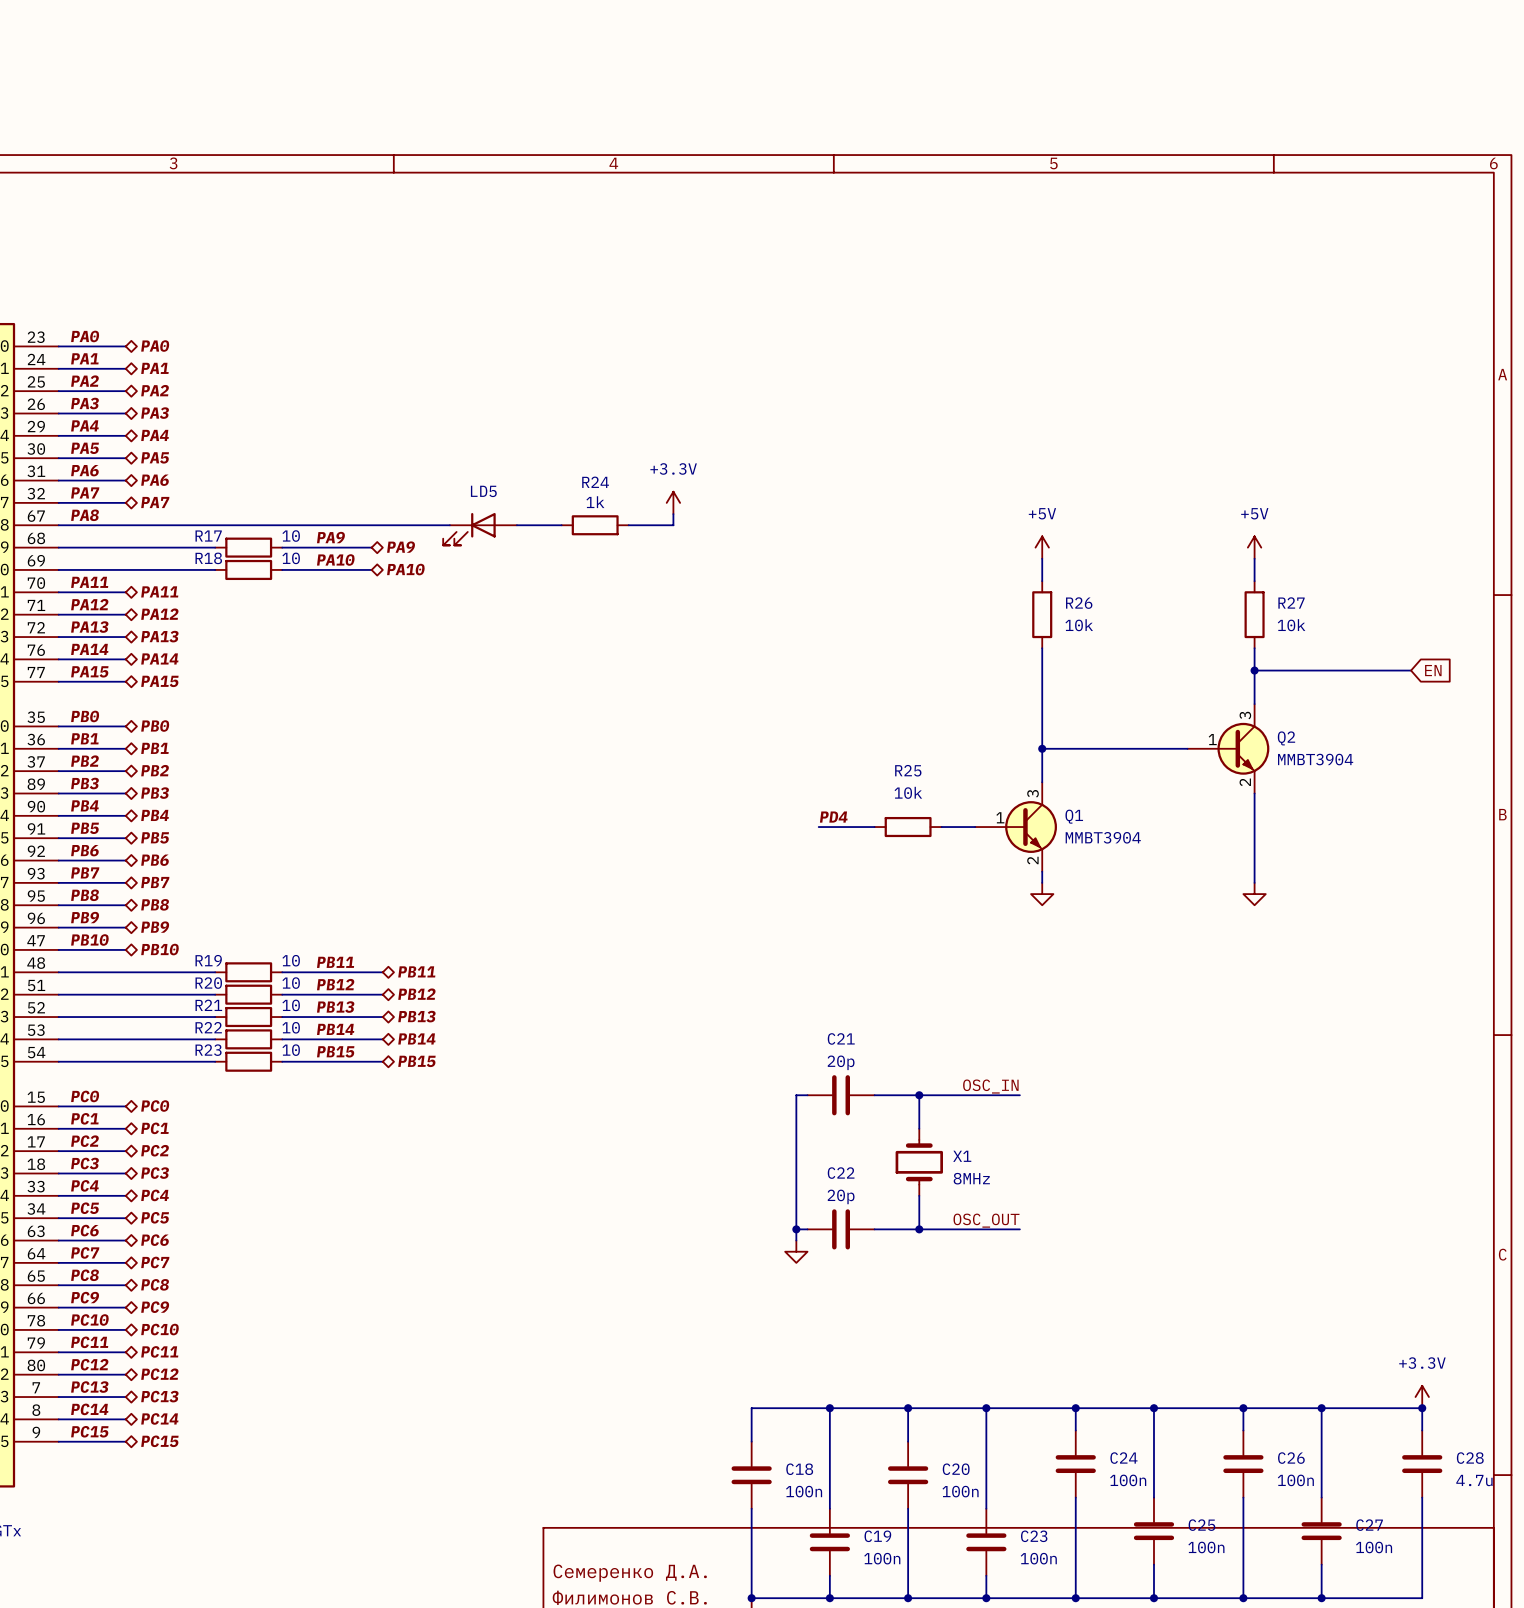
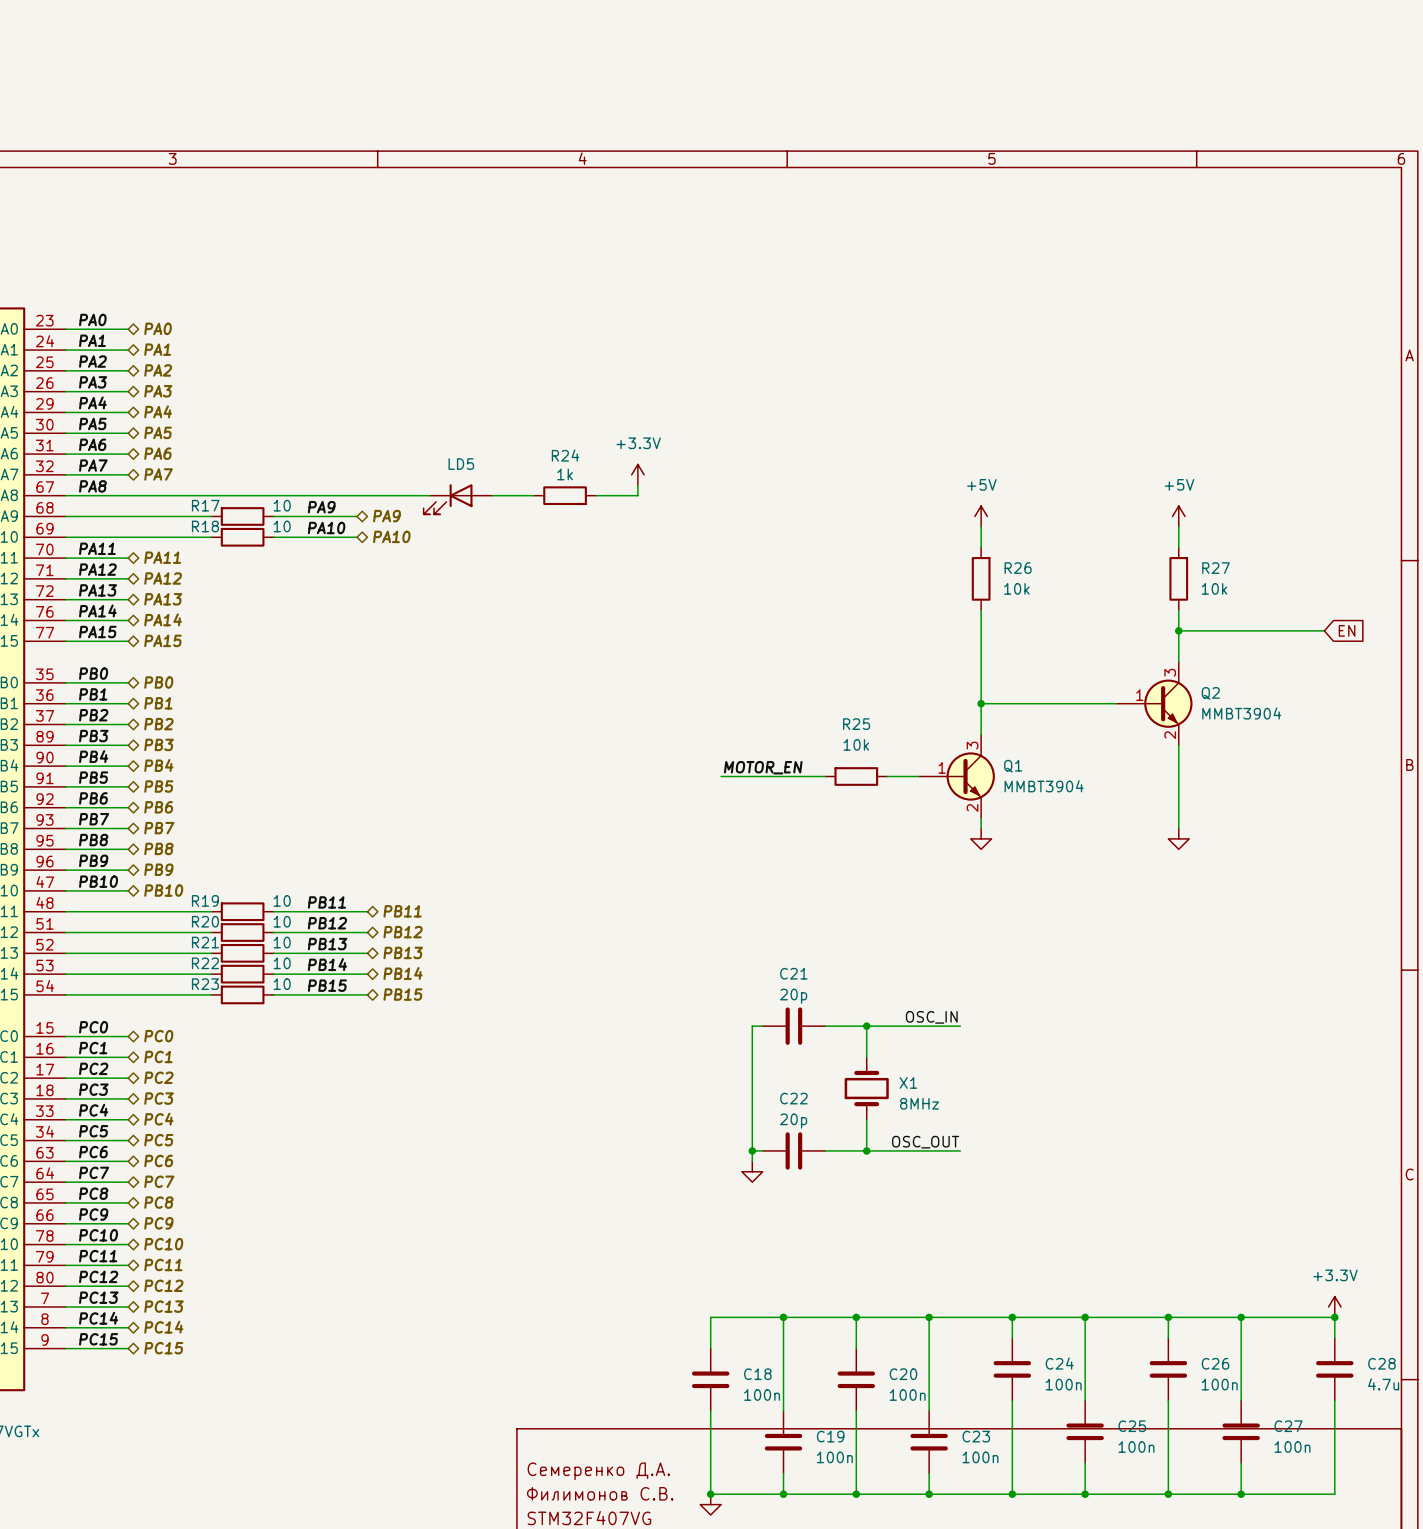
label: PD4 (833, 817) -> none
label: none -> MOTOR_EN (763, 767)
wire: none -> (721, 776) (773, 776)

